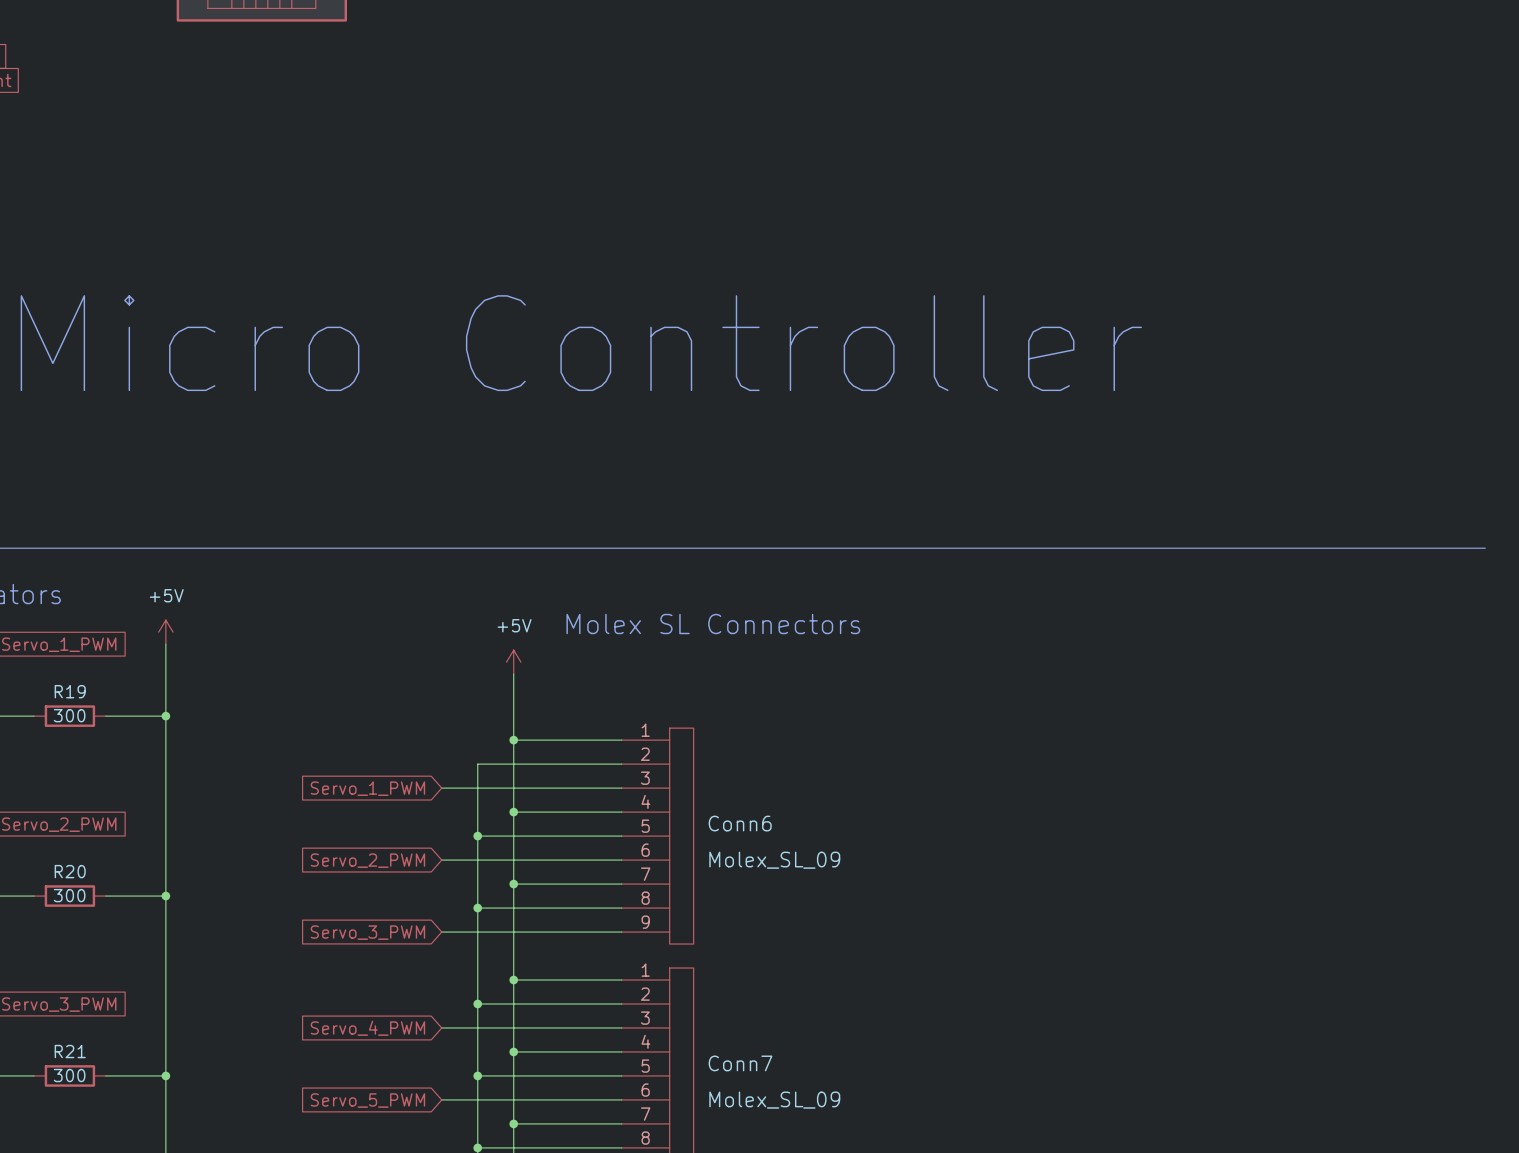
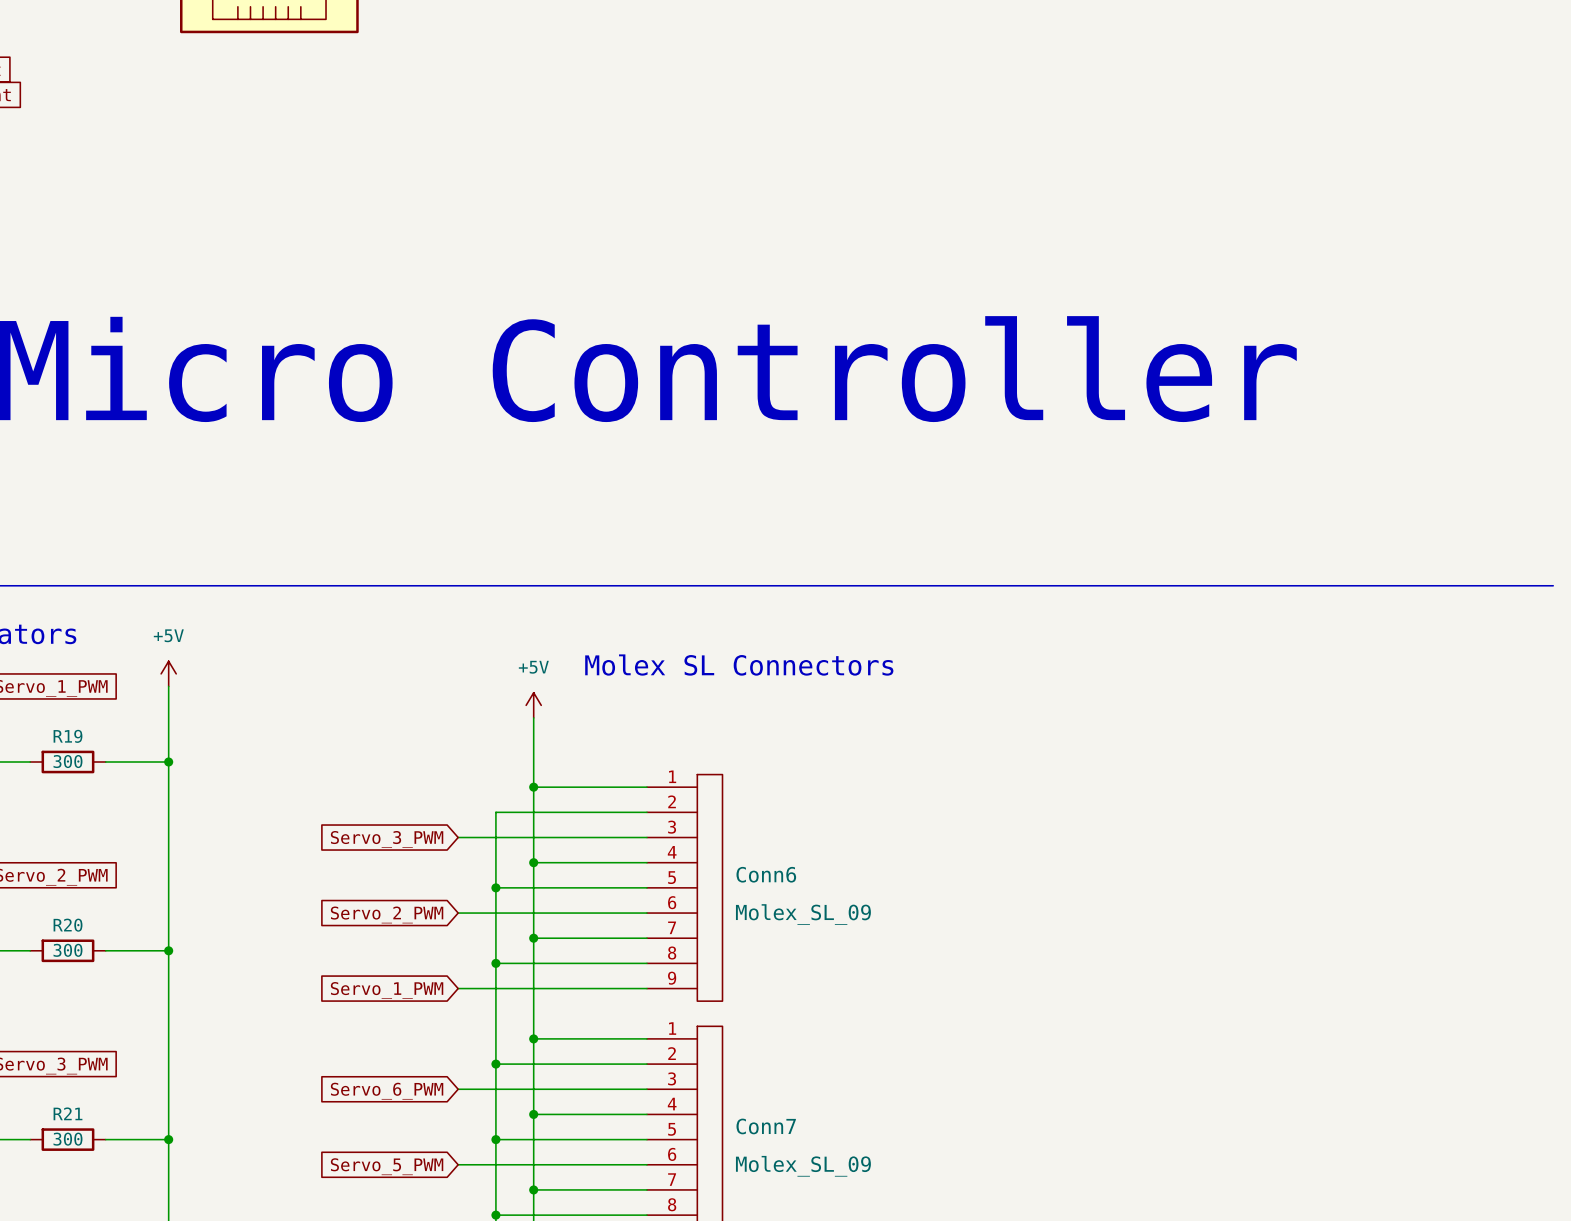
global label: Servo_1_PWM (367, 788) -> Servo_3_PWM (387, 839)
global label: Servo_3_PWM (367, 932) -> Servo_1_PWM (387, 990)
global label: Servo_4_PWM (367, 1028) -> Servo_6_PWM (387, 1091)

